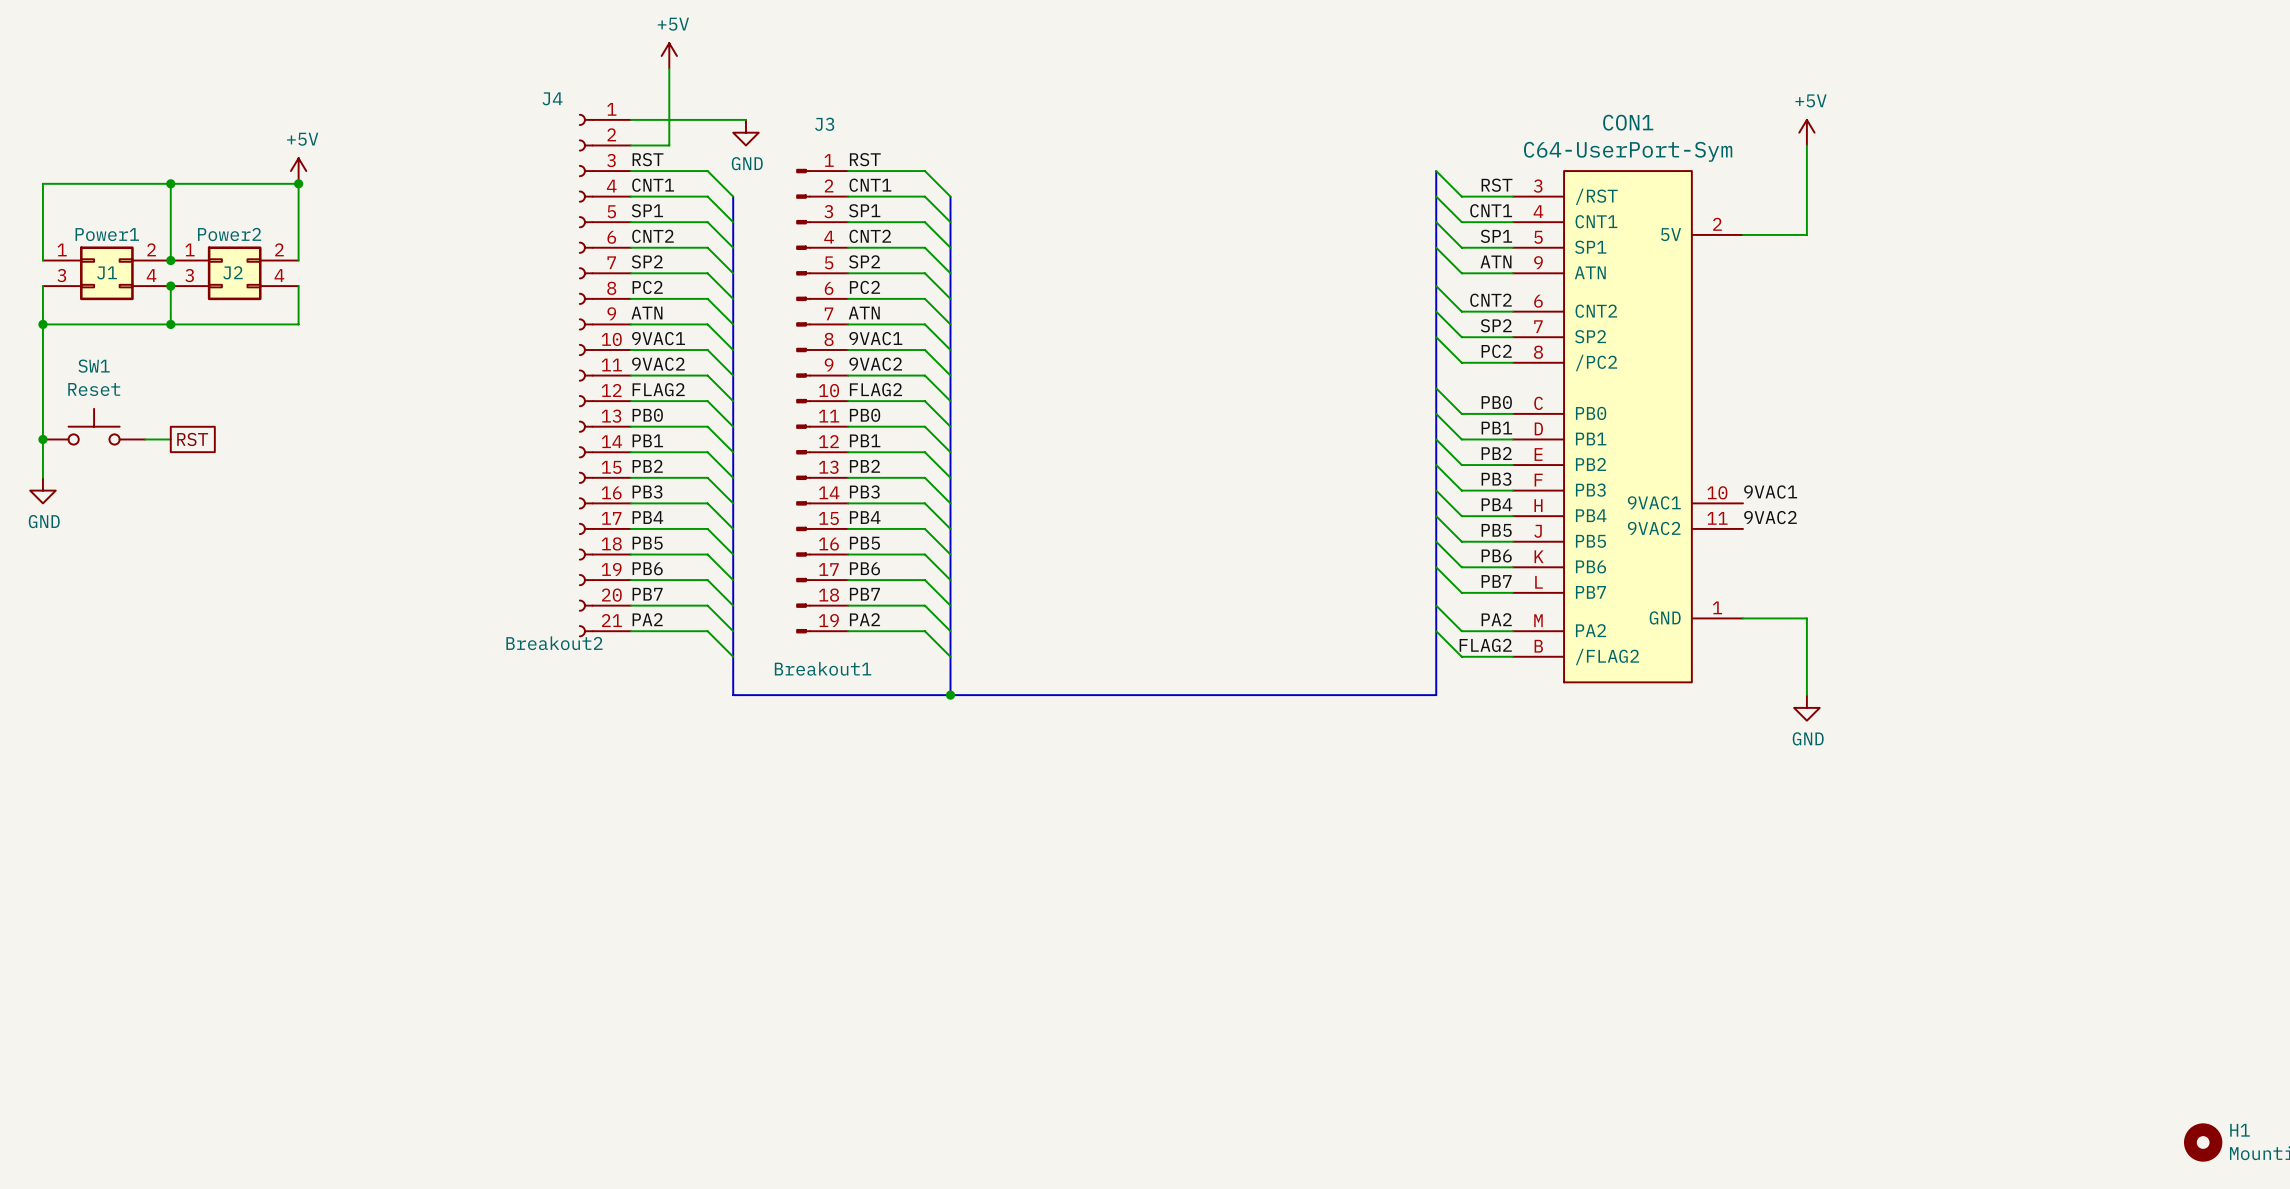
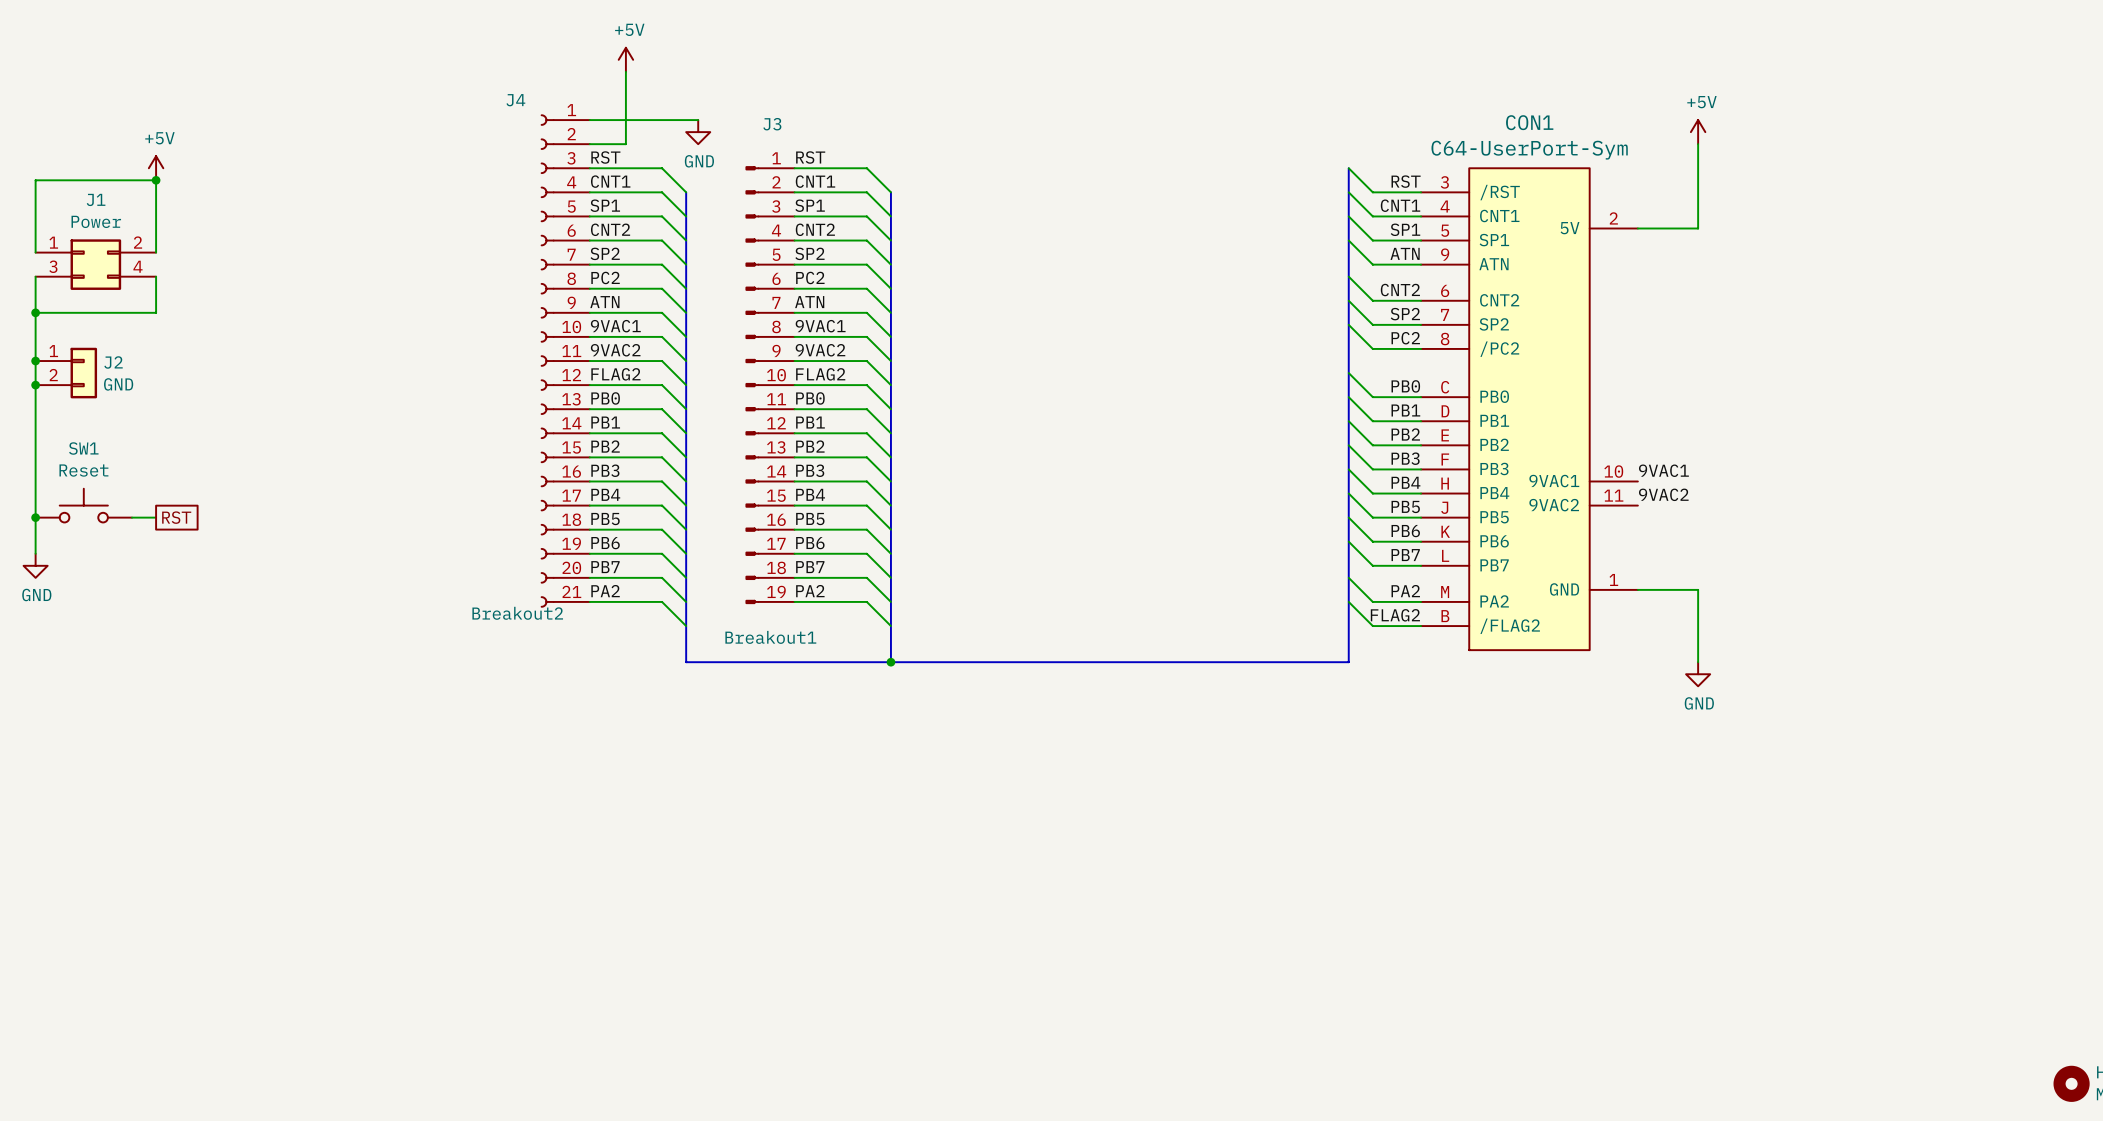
power symbol position: +5V (298, 171) -> +5V (156, 168)
wire: (170, 183) (298, 183) (298, 260) -> none
junction: (298, 183) -> none
J1 value: Power1 (107, 234) -> Power (96, 221)
J2 value: Power2 (229, 234) -> GND (118, 384)
J2 symbol: [170, 246, 299, 301] -> [35, 347, 98, 399]
junction: (170, 260) -> none
J1 name position: J1 (107, 272) -> J1 (96, 199)
J2 name position: J2 (233, 272) -> J2 (113, 362)
junction: (170, 286) -> none
wire: (298, 286) (298, 324) (170, 324) -> none
junction: (170, 324) -> none
junction: none -> (35, 361)
junction: none -> (35, 385)
SW1 position: (94, 426) -> (83, 505)
junction: (42, 439) -> none
wire: (145, 439) (170, 439) -> (131, 517) (156, 517)
global label position: RST (192, 439) -> RST (176, 517)
wire: none -> (35, 457) (35, 553)
power symbol position: GND (42, 490) -> GND (35, 565)
junction: none -> (35, 517)

